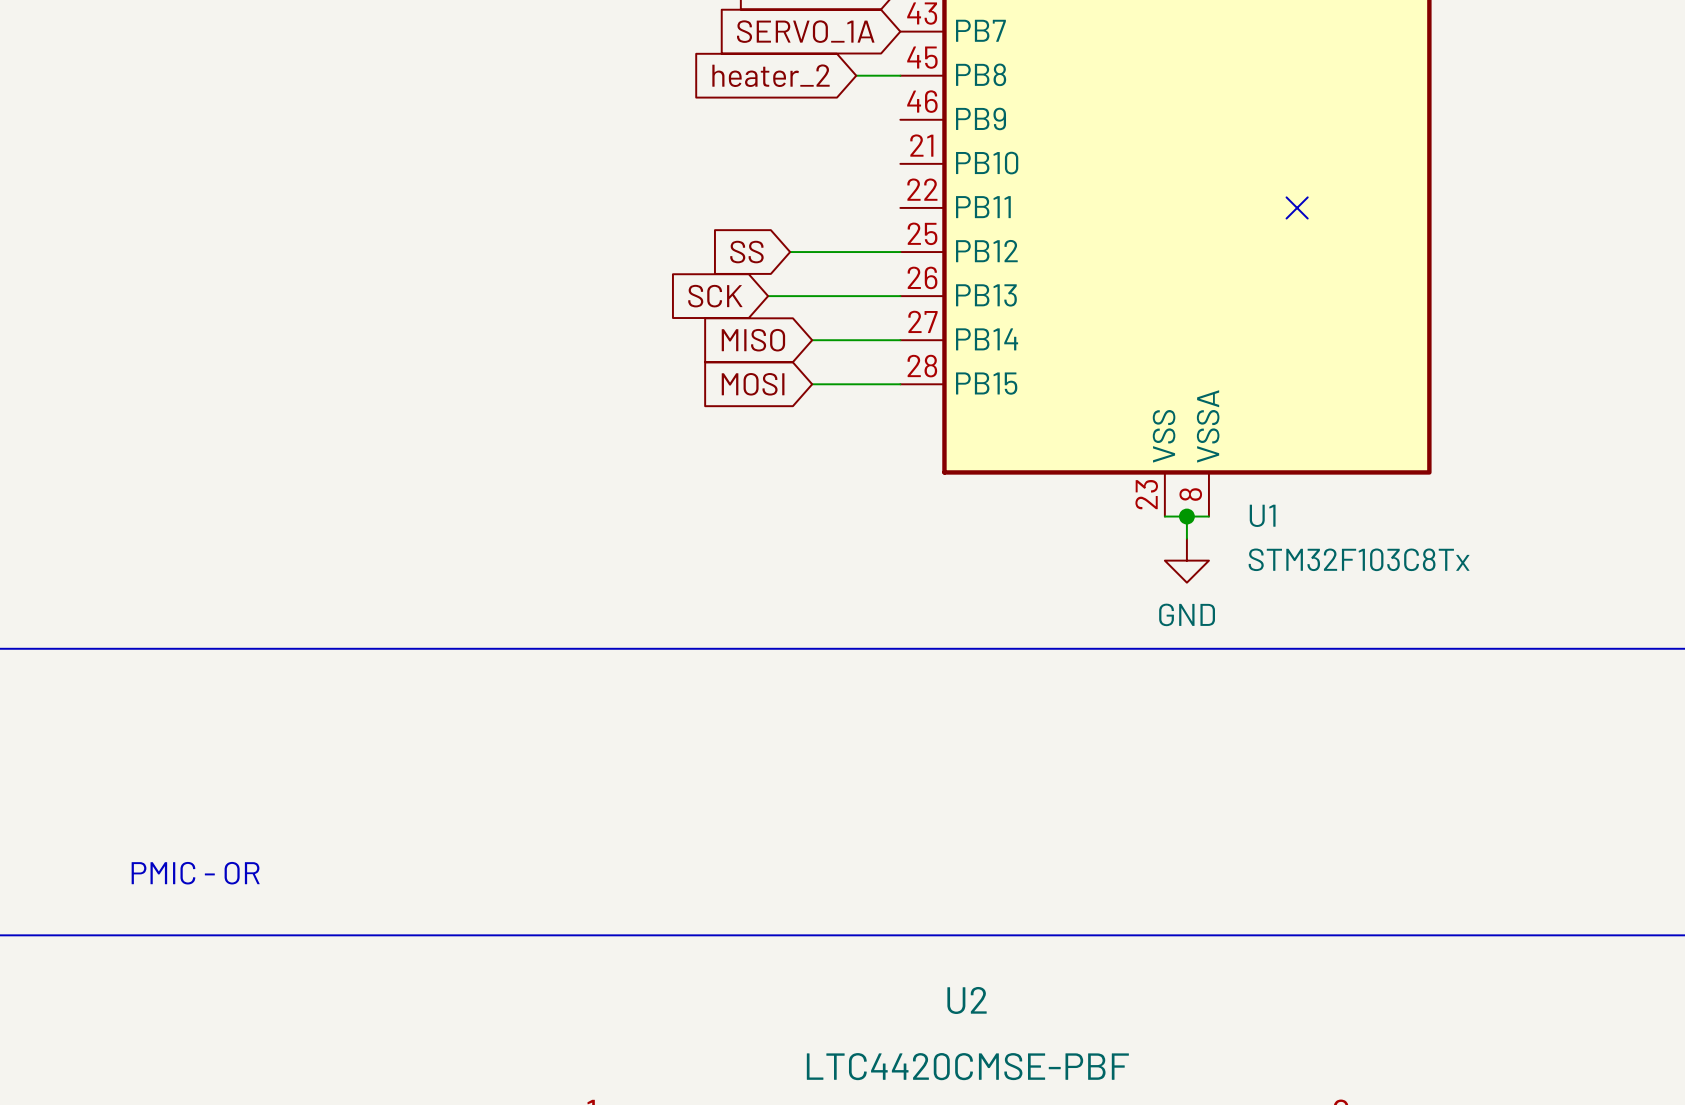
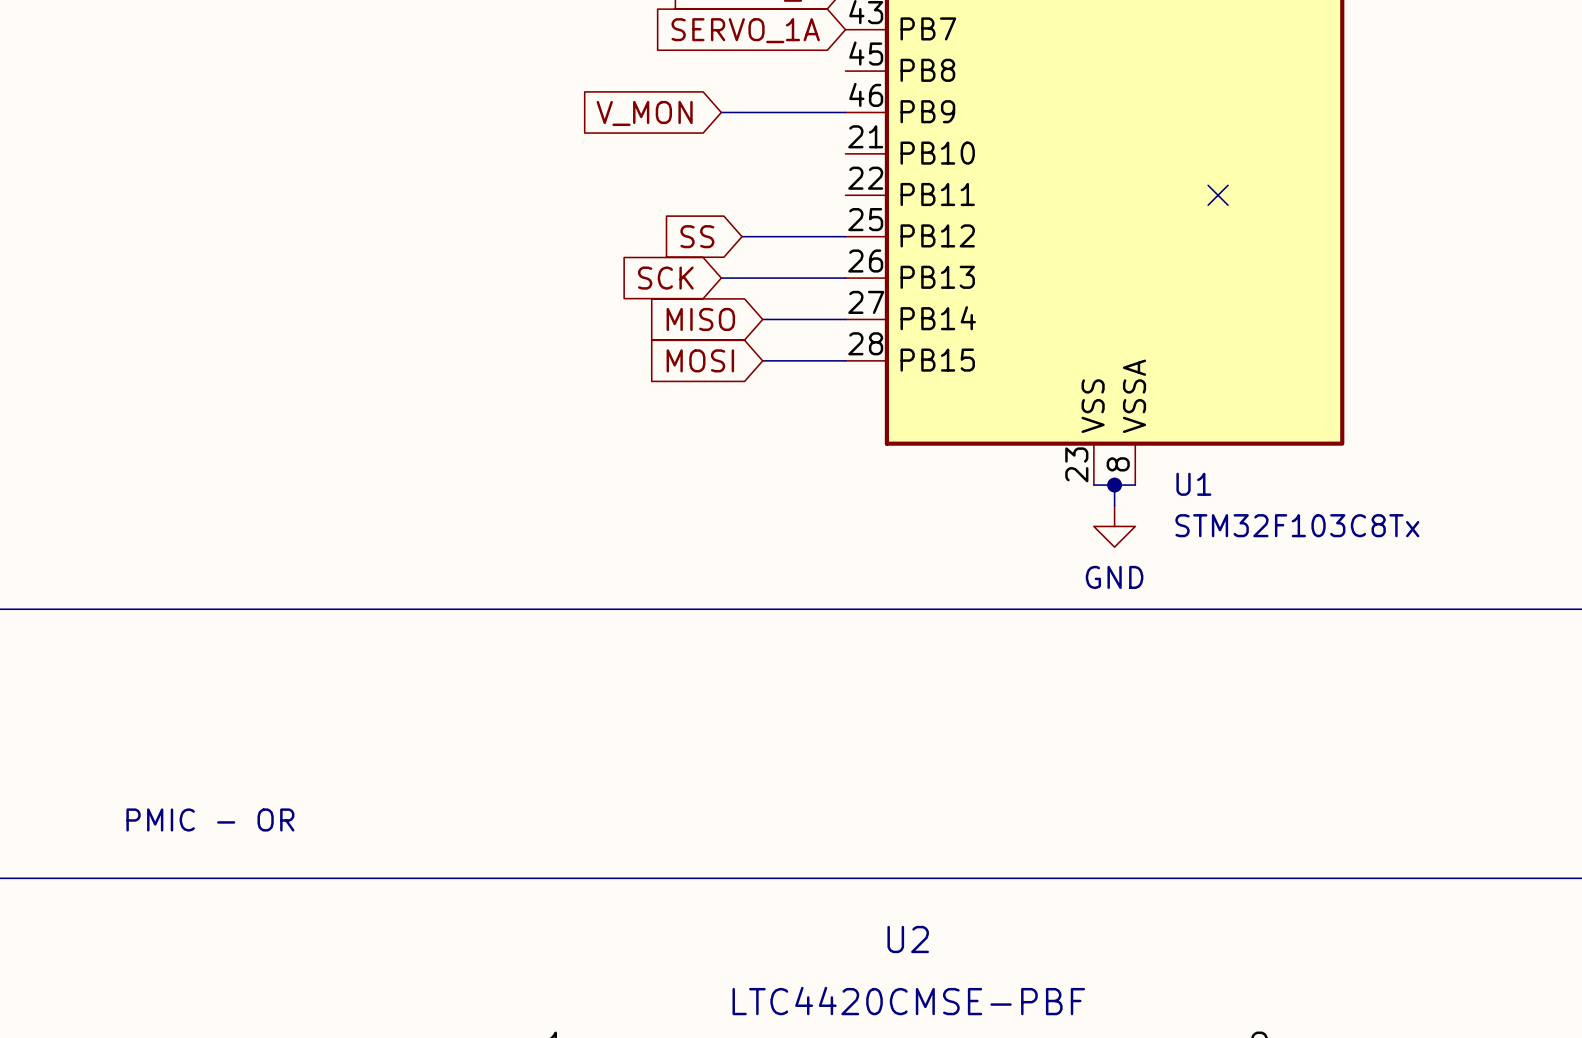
global label: heater_2 (771, 75) -> none
wire: (856, 75) (900, 75) -> none
global label: none -> V_MON (644, 113)
wire: none -> (721, 112) (845, 112)

